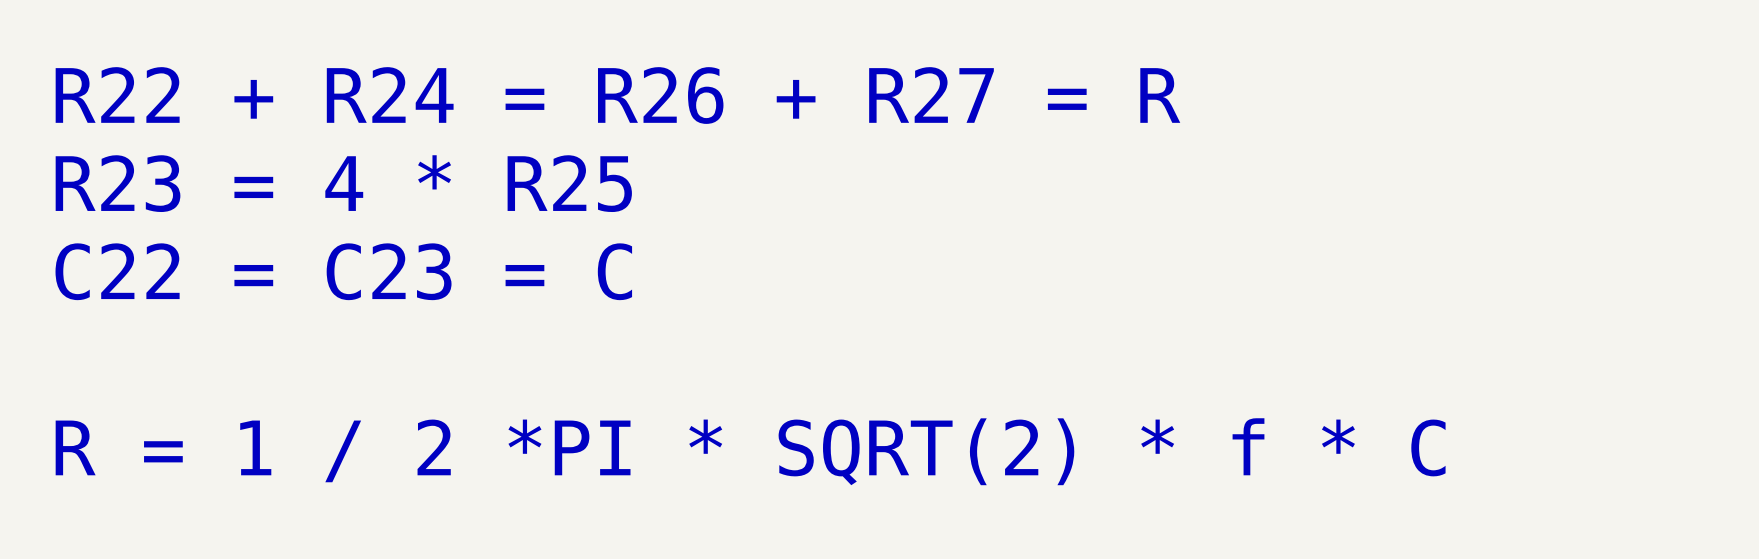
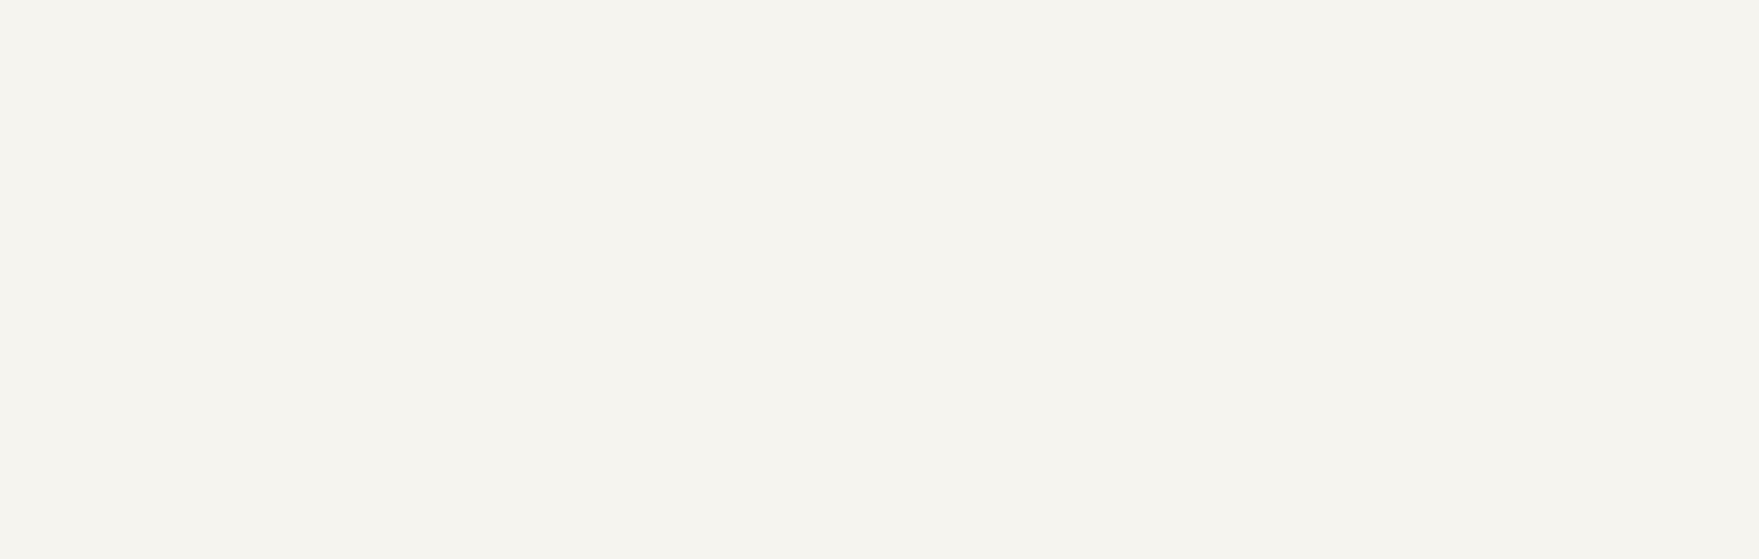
text: R22 + R24 = R26 + R27 = R (617, 95) -> none
text: R23 = 4 * R25 (343, 183) -> none
text: C22 = C23 = C (343, 271) -> none
text: R = 1 / 2 *PI * SQRT(2) * f * C (750, 451) -> none

